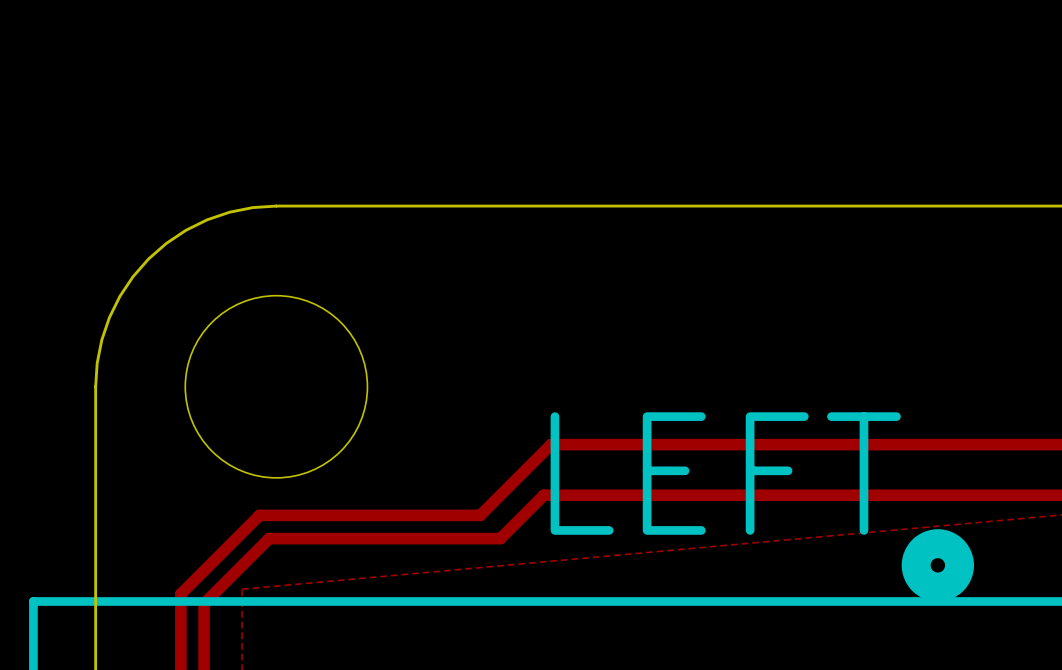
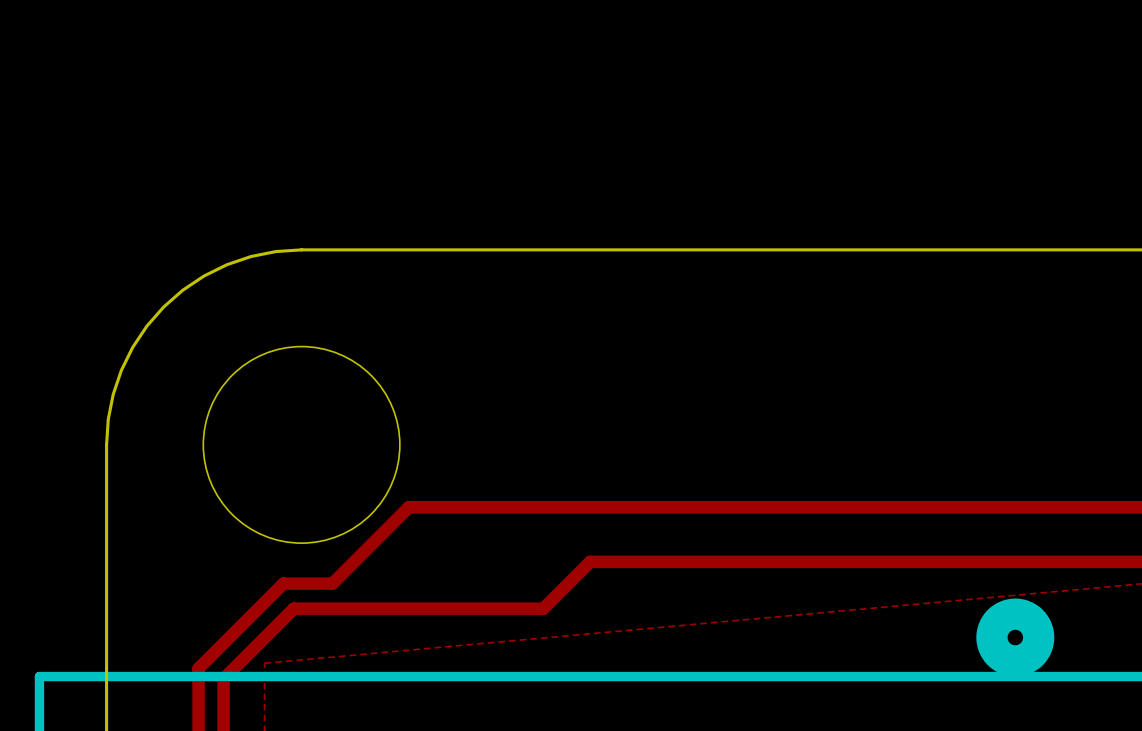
track: (551, 444) (480, 515) (304, 515) -> (597, 507) (408, 507) (332, 583)
text: LEFT (725, 473) -> none

